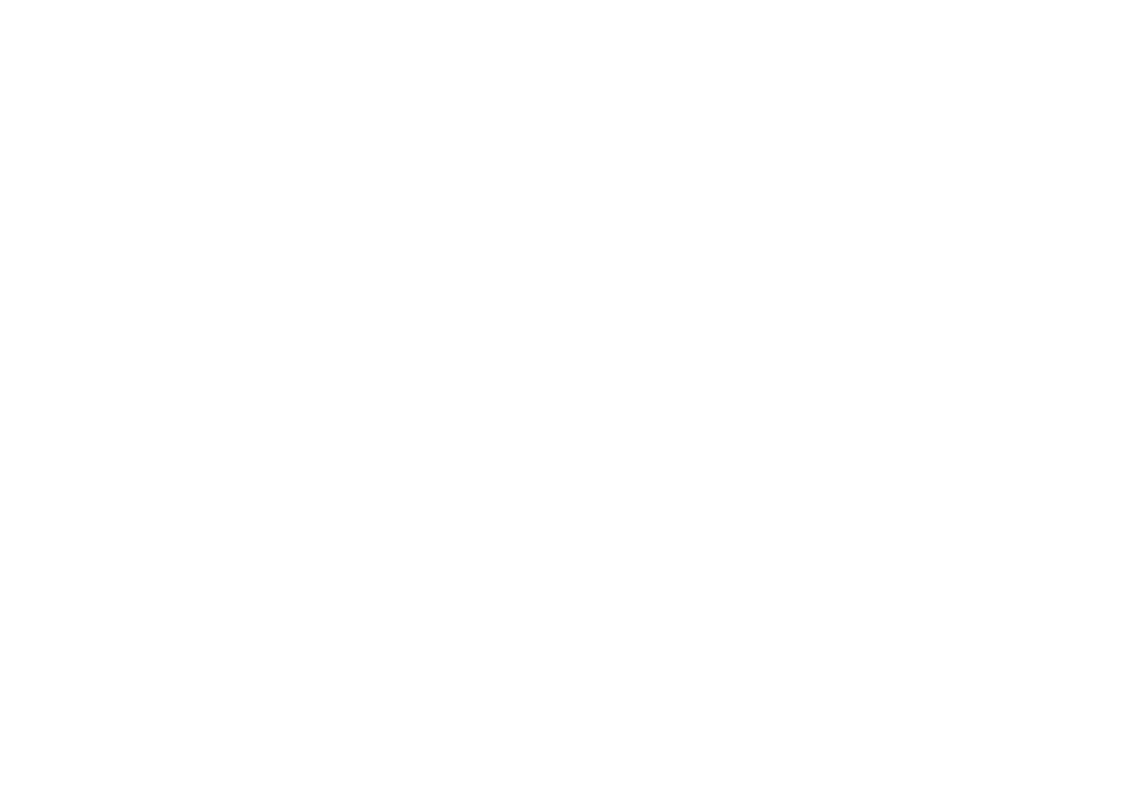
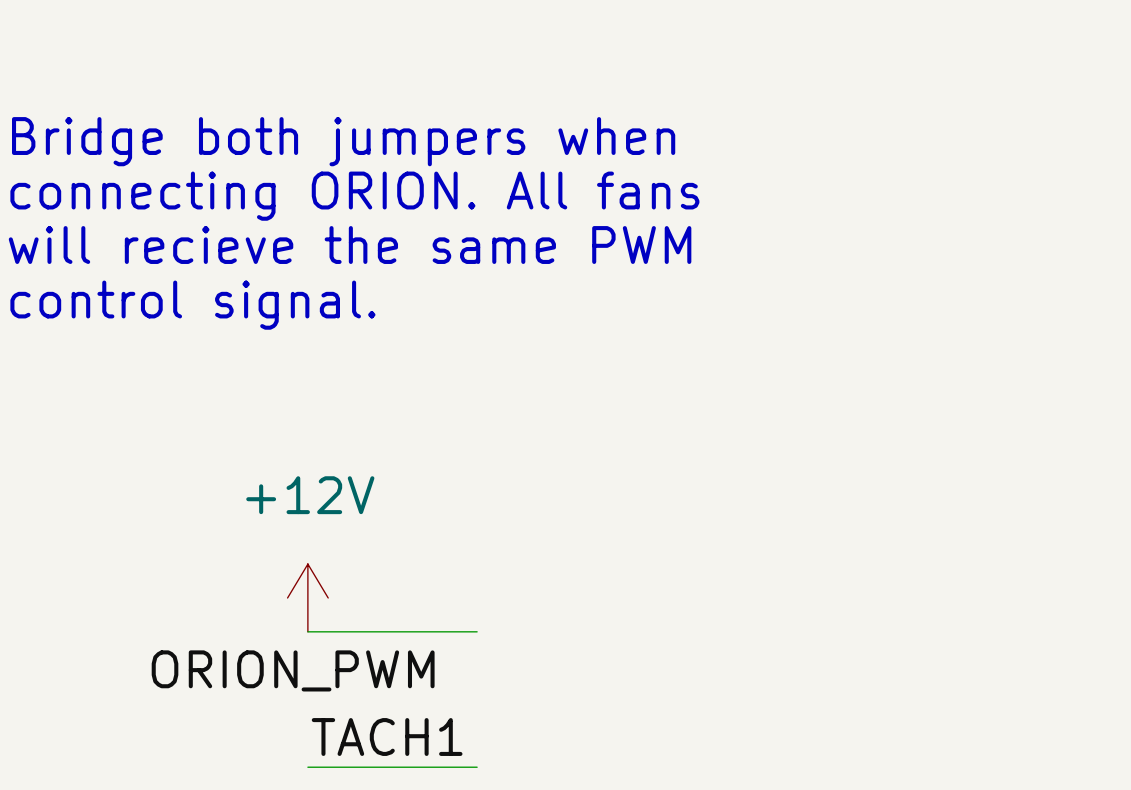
text: none -> Bridge both jumpers when (343, 141)
text: none -> connecting ORION. All fans (354, 196)
text: none -> will recieve the same PWM (350, 245)
text: none -> control signal. (192, 305)
power symbol: none -> +12V (307, 597)
wire: none -> (307, 631) (477, 631)
label: none -> ORION_PWM (293, 670)
label: none -> TACH1 (387, 737)
wire: none -> (307, 767) (477, 767)

